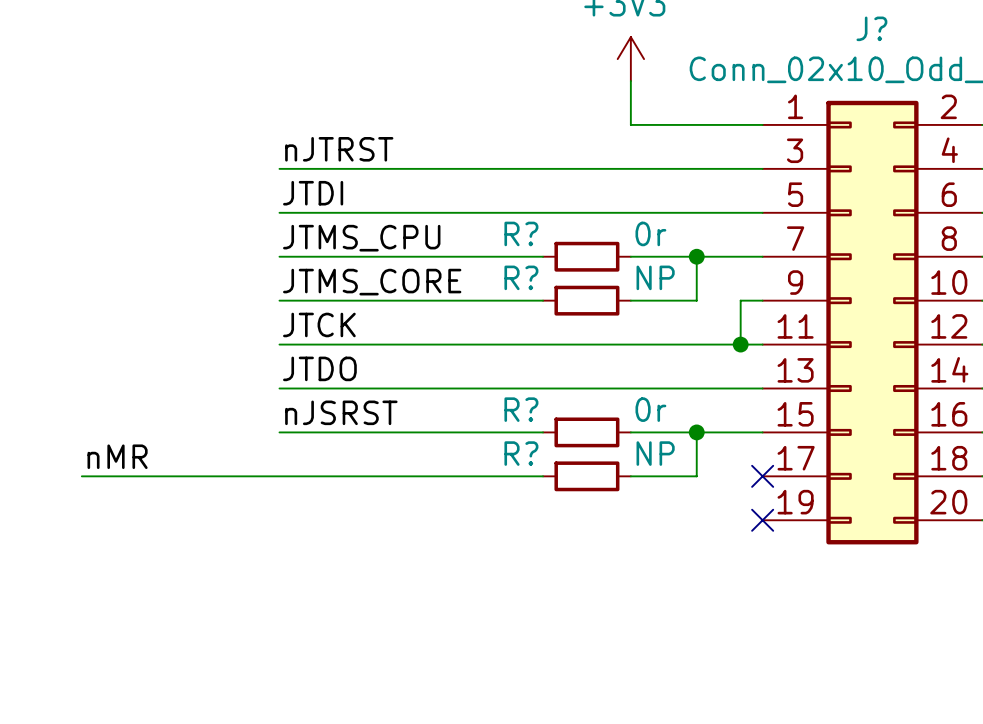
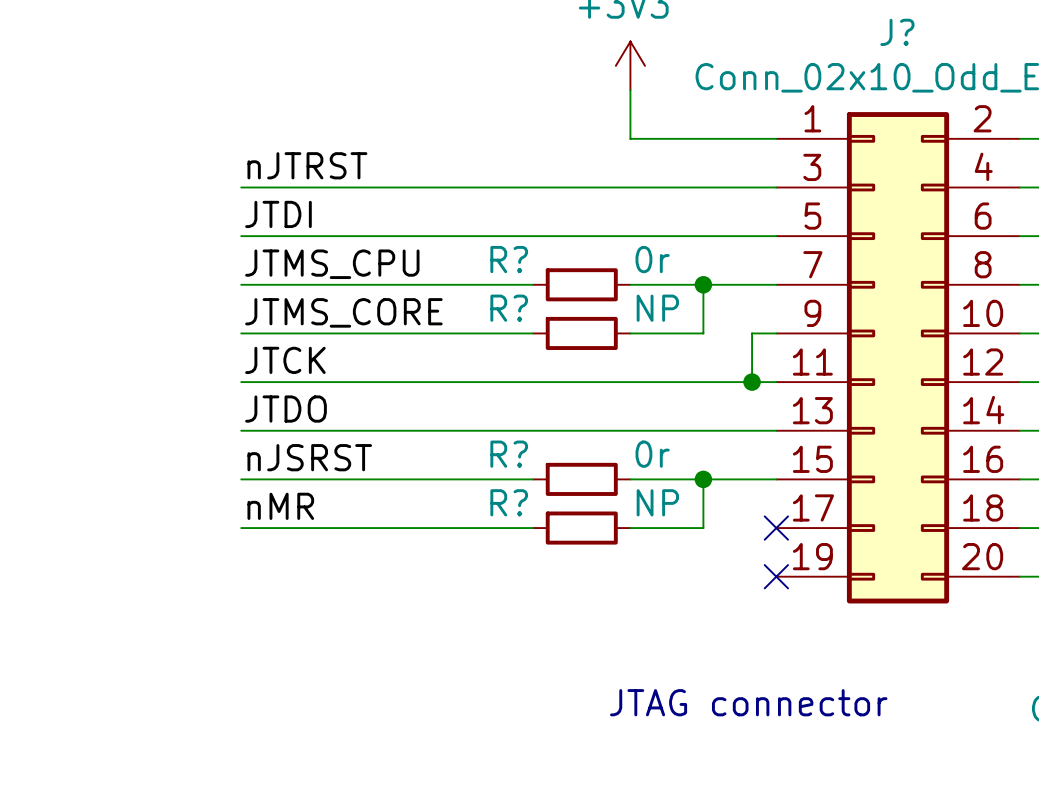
label position: nMR (117, 456) -> nMR (280, 506)
wire: (81, 476) (279, 476) -> none
text: none -> JTAG connector (748, 702)

